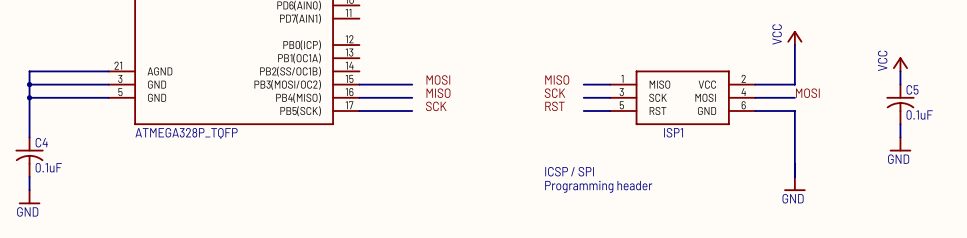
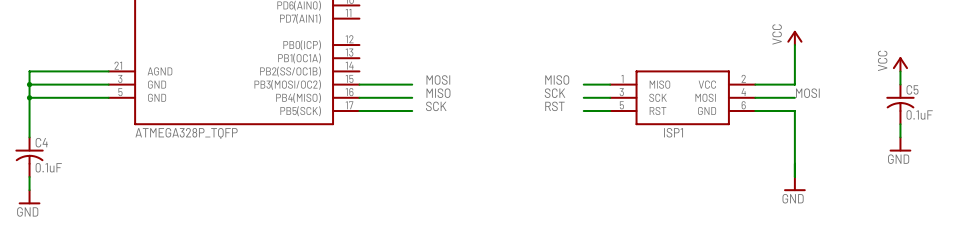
text: ICSP / SPI (569, 171) -> none
text: Programming header (598, 186) -> none

